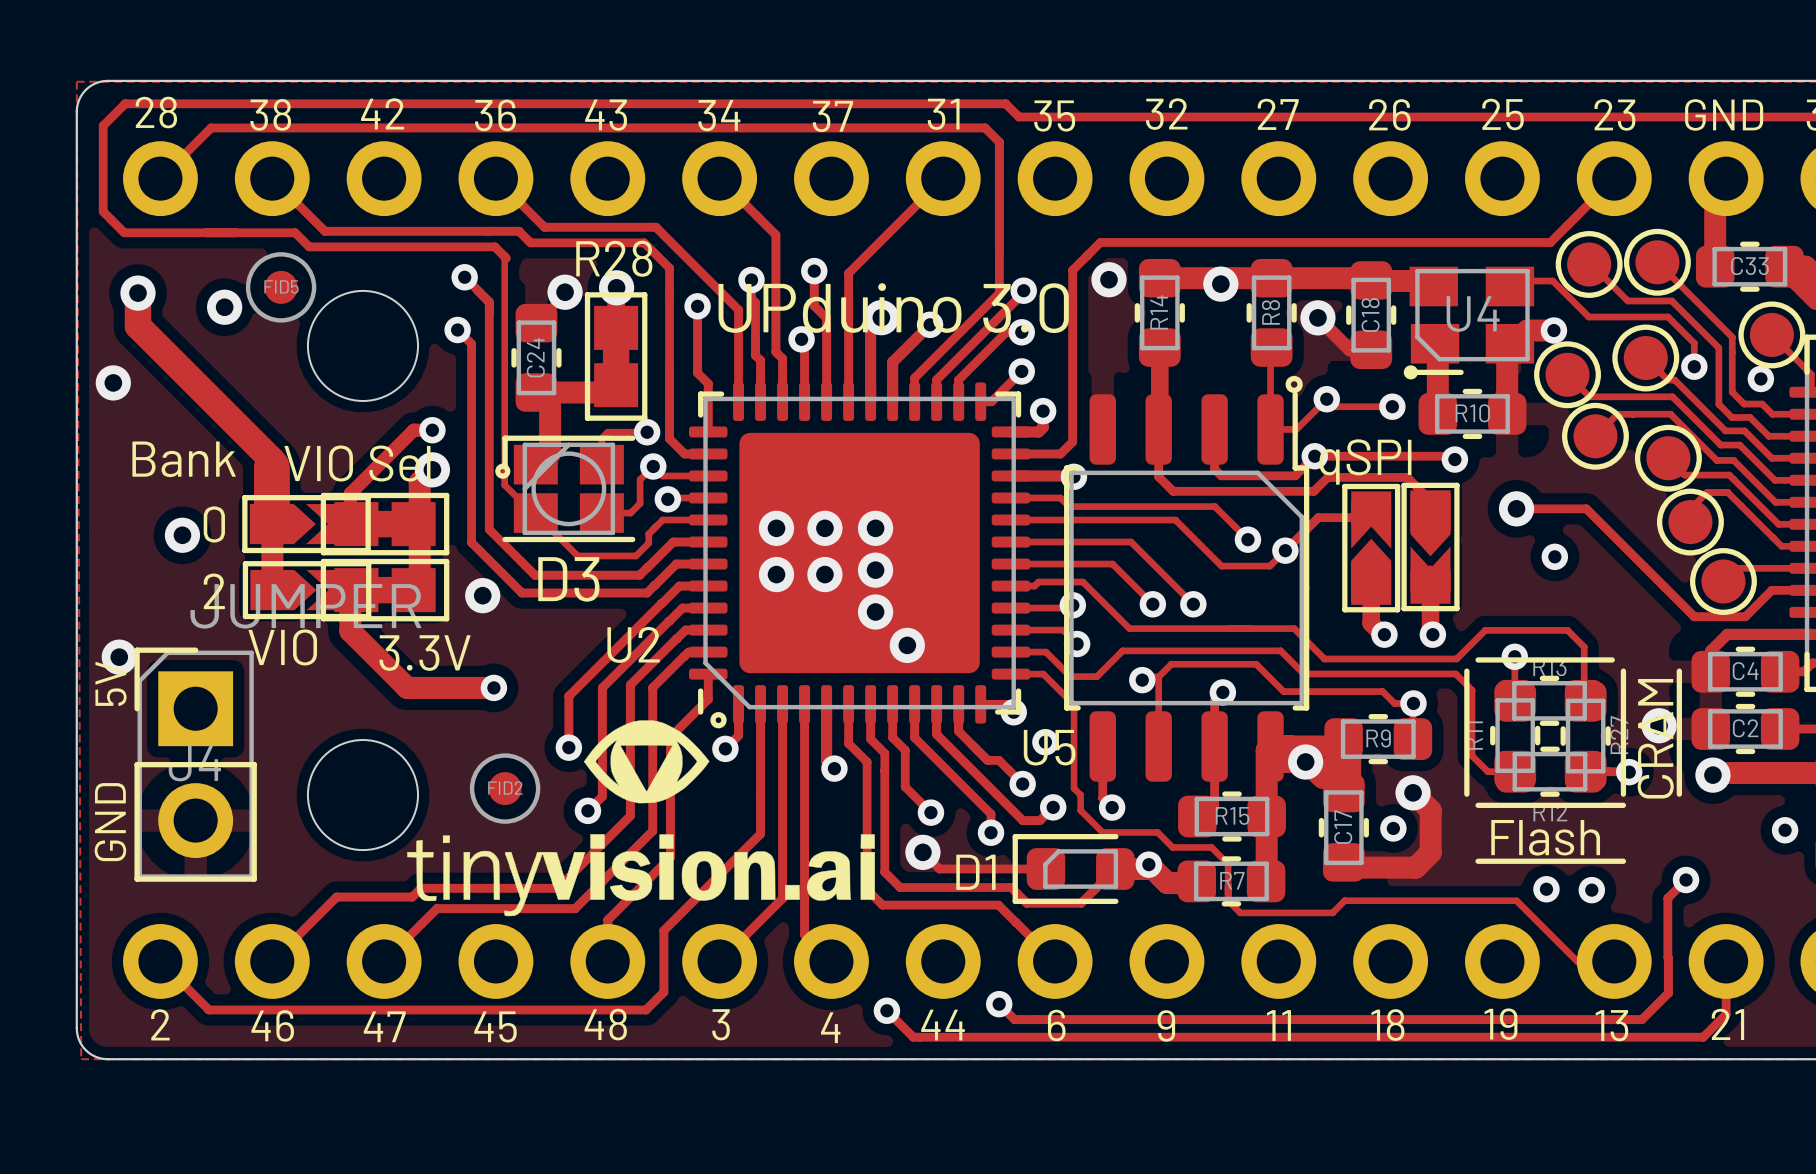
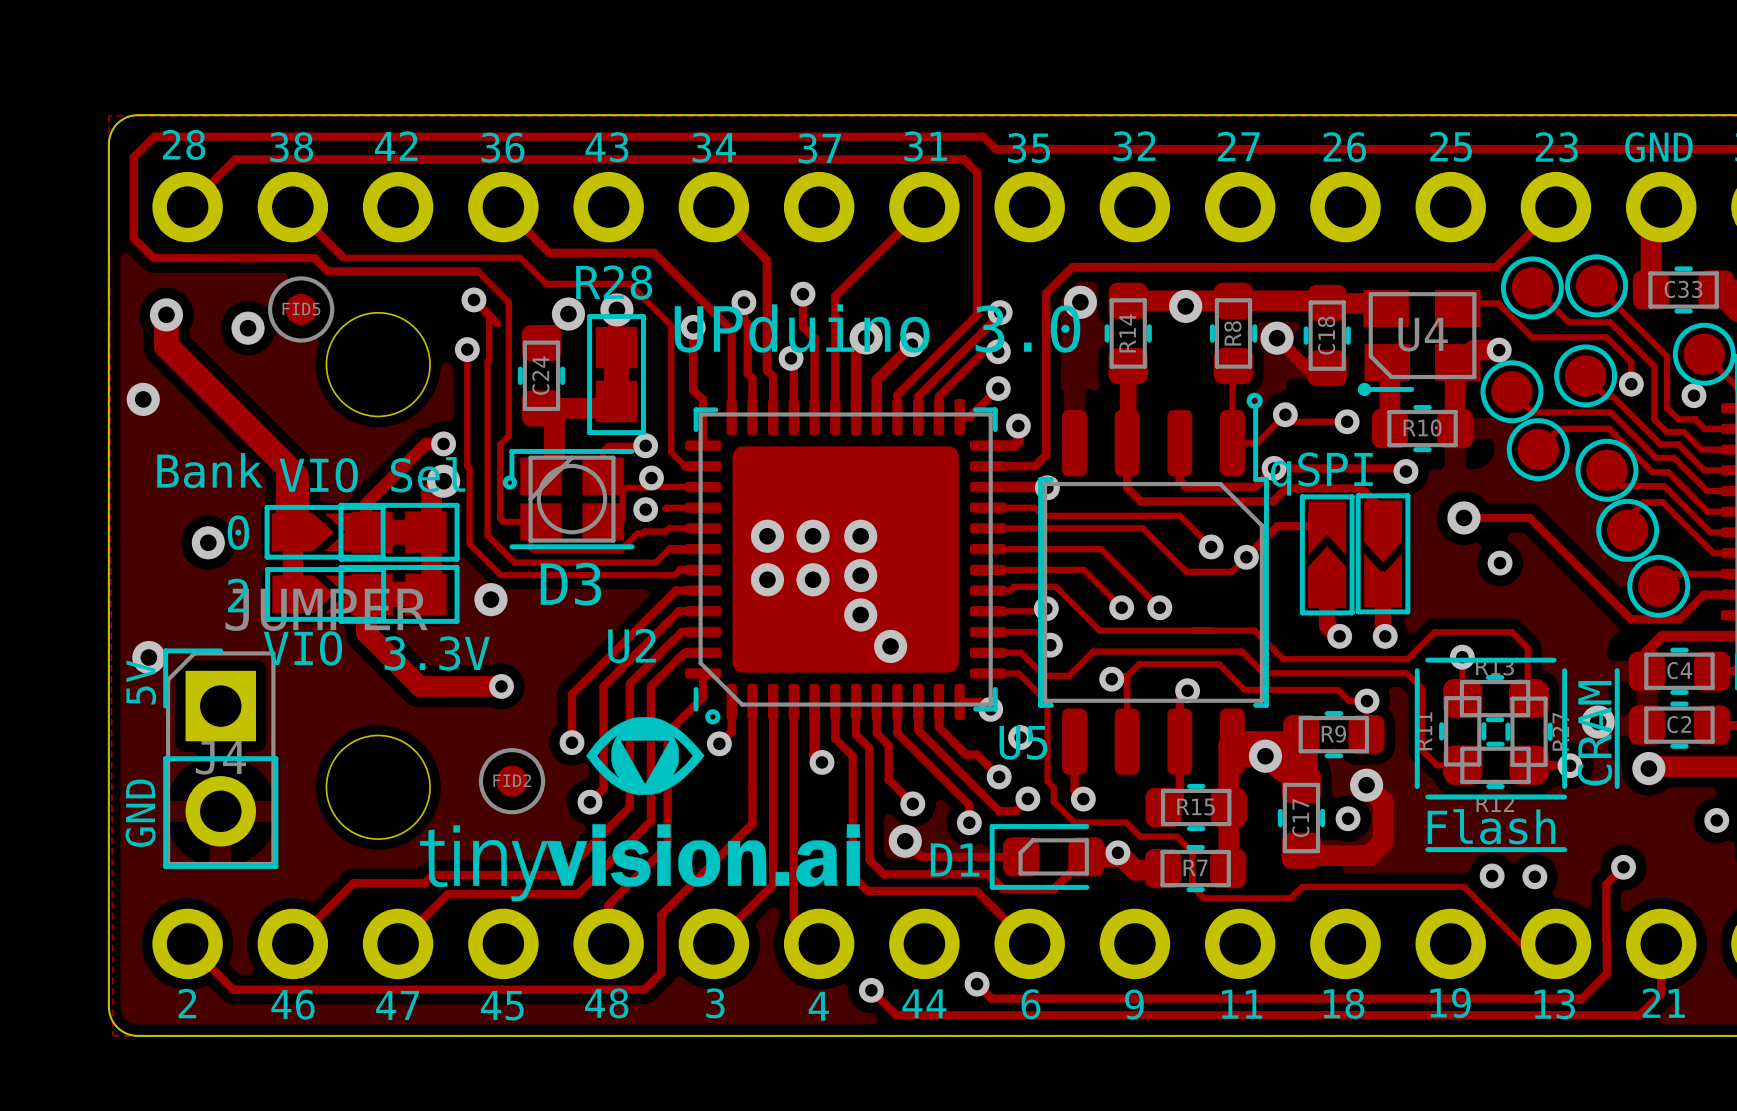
track: (324, 231) (519, 231) (530, 242) (644, 242) (669, 268) (669, 438) (684, 453) (689, 453) -> (342, 256) (520, 257) (546, 283) (629, 283) (671, 325) (671, 452) (685, 466)
track: (468, 246) (494, 246) (506, 258) -> none
track: (504, 256) (504, 485) (521, 501) (550, 501) (550, 528) (577, 555) (635, 555) (648, 543) (648, 533) (662, 520) (671, 520) -> (477, 271) (508, 302) (508, 435) (500, 444) (500, 518) (503, 521) (530, 521) (530, 546) (533, 549) (620, 549) (637, 533) (644, 531) (665, 531) (669, 528)
track: (480, 293) (489, 301) (489, 529) (535, 575) (639, 575) (673, 542) -> (489, 315) (487, 535) (514, 562) (655, 562) (670, 549)
track: (457, 329) (471, 343) (471, 542) (522, 593) (647, 593) (654, 585) -> (467, 349) (469, 544) (500, 575) (674, 575) (680, 569)
track: (653, 466) (640, 479) (640, 503) (630, 513) (619, 513) -> (651, 478) (651, 482) (646, 487) (626, 487) (622, 491) (622, 518) (619, 521)
via position: (667, 499) -> (645, 509)
track: (683, 564) (676, 564) (654, 585) -> none

